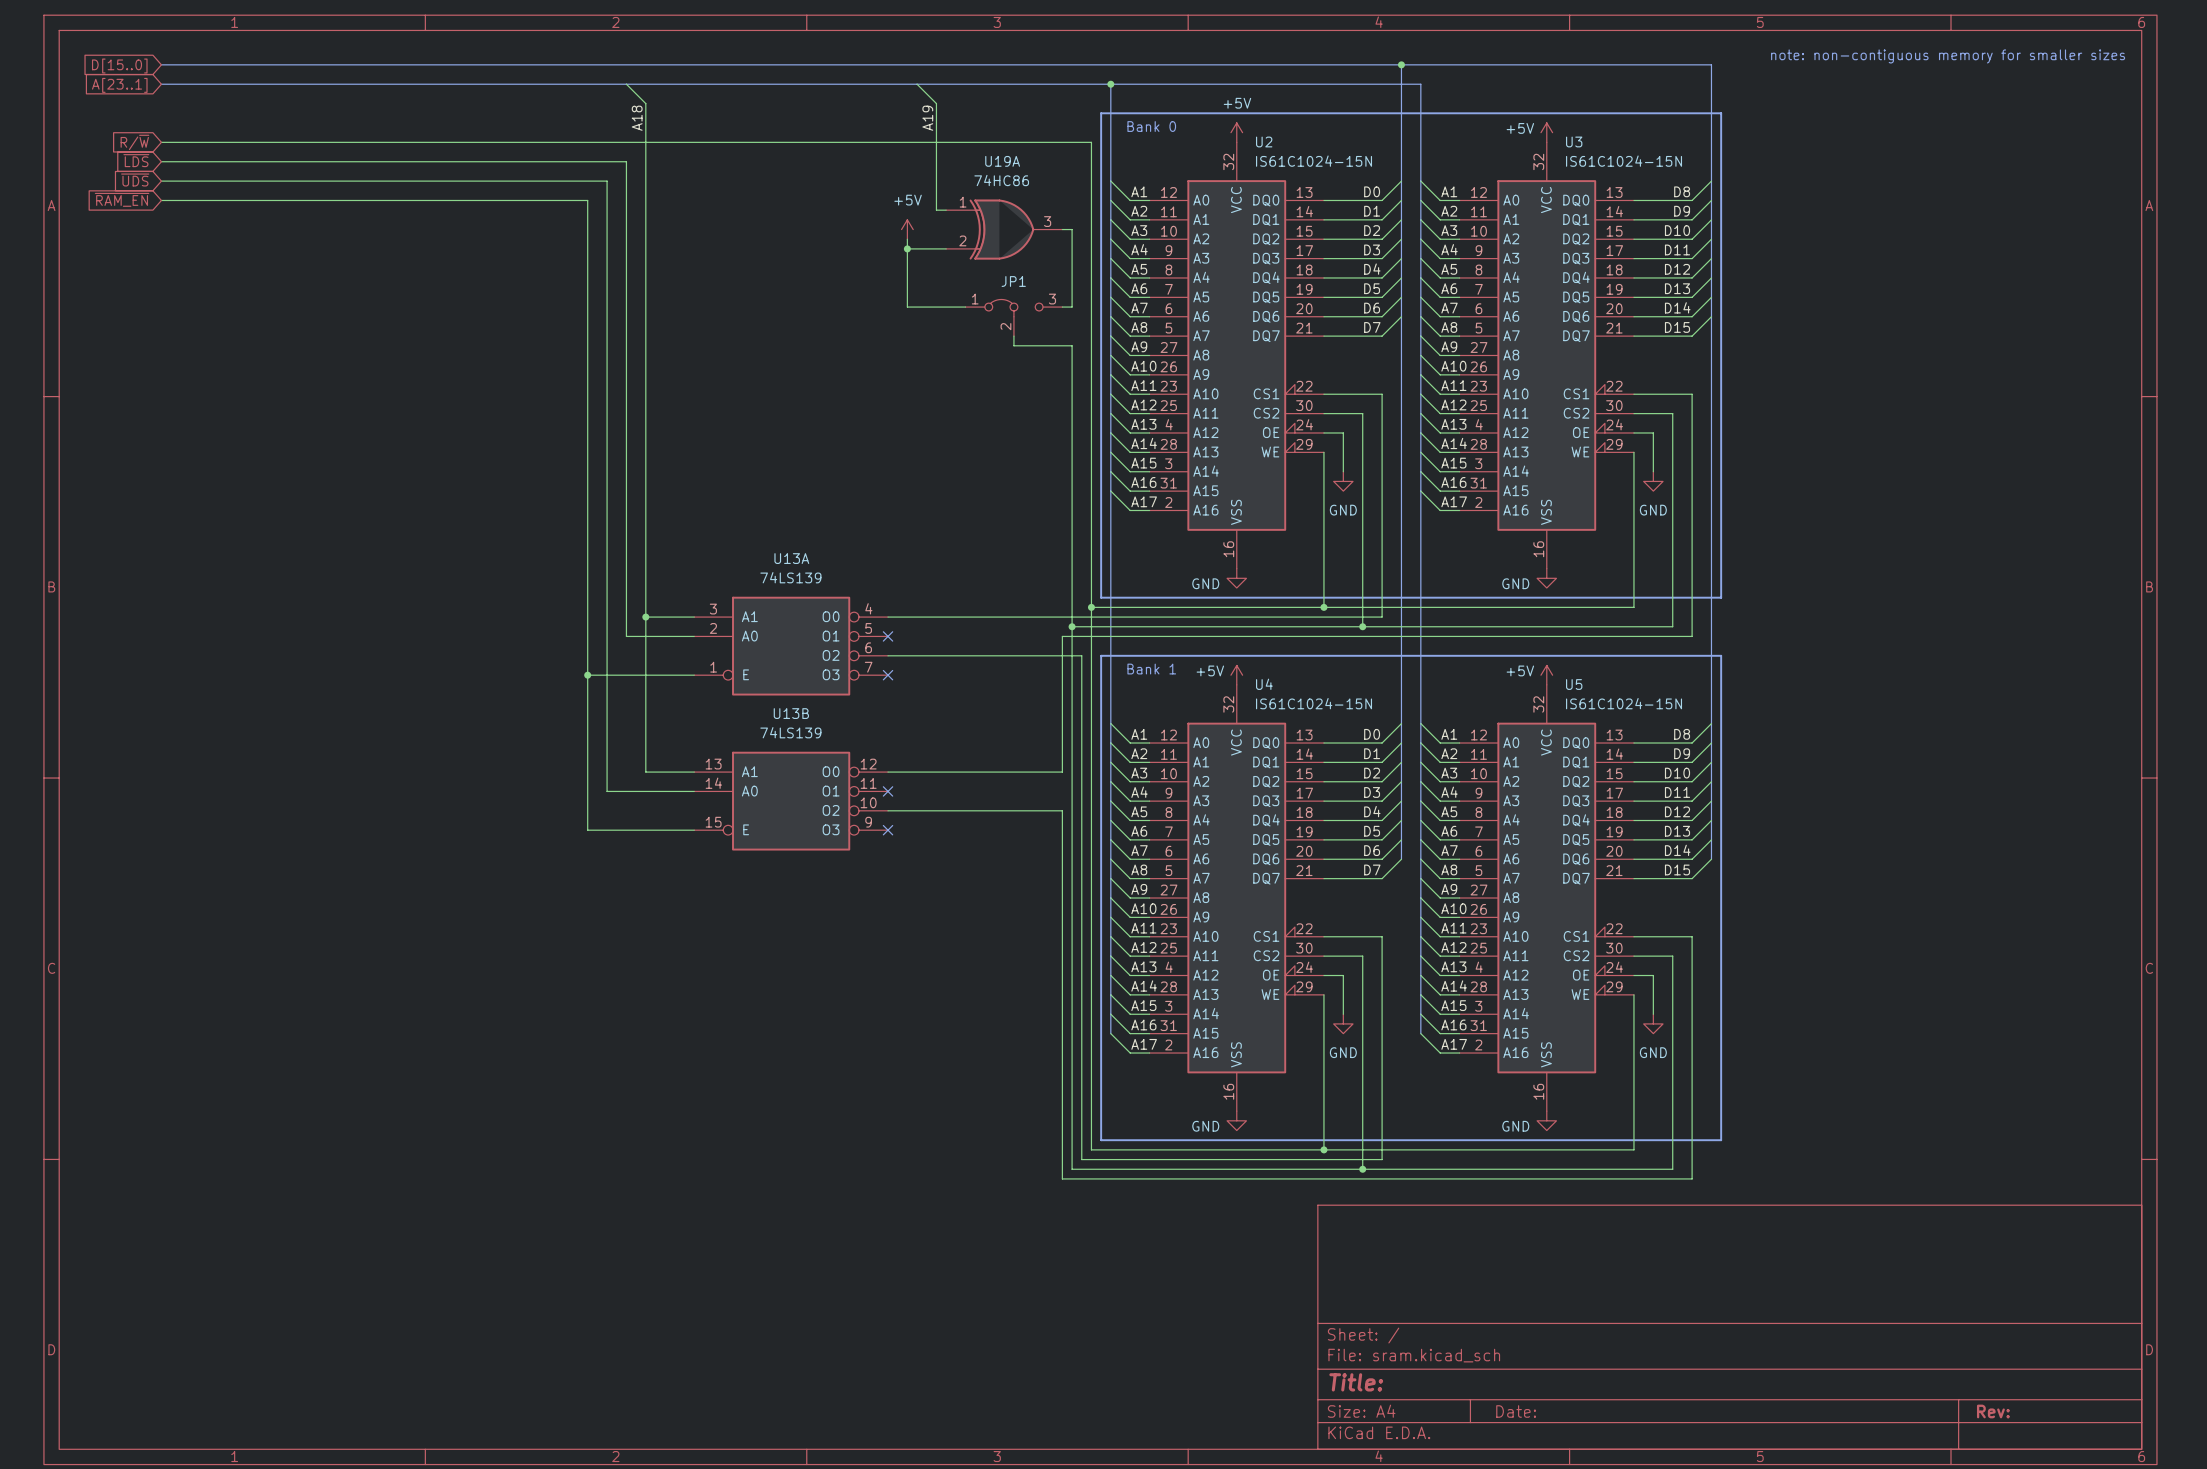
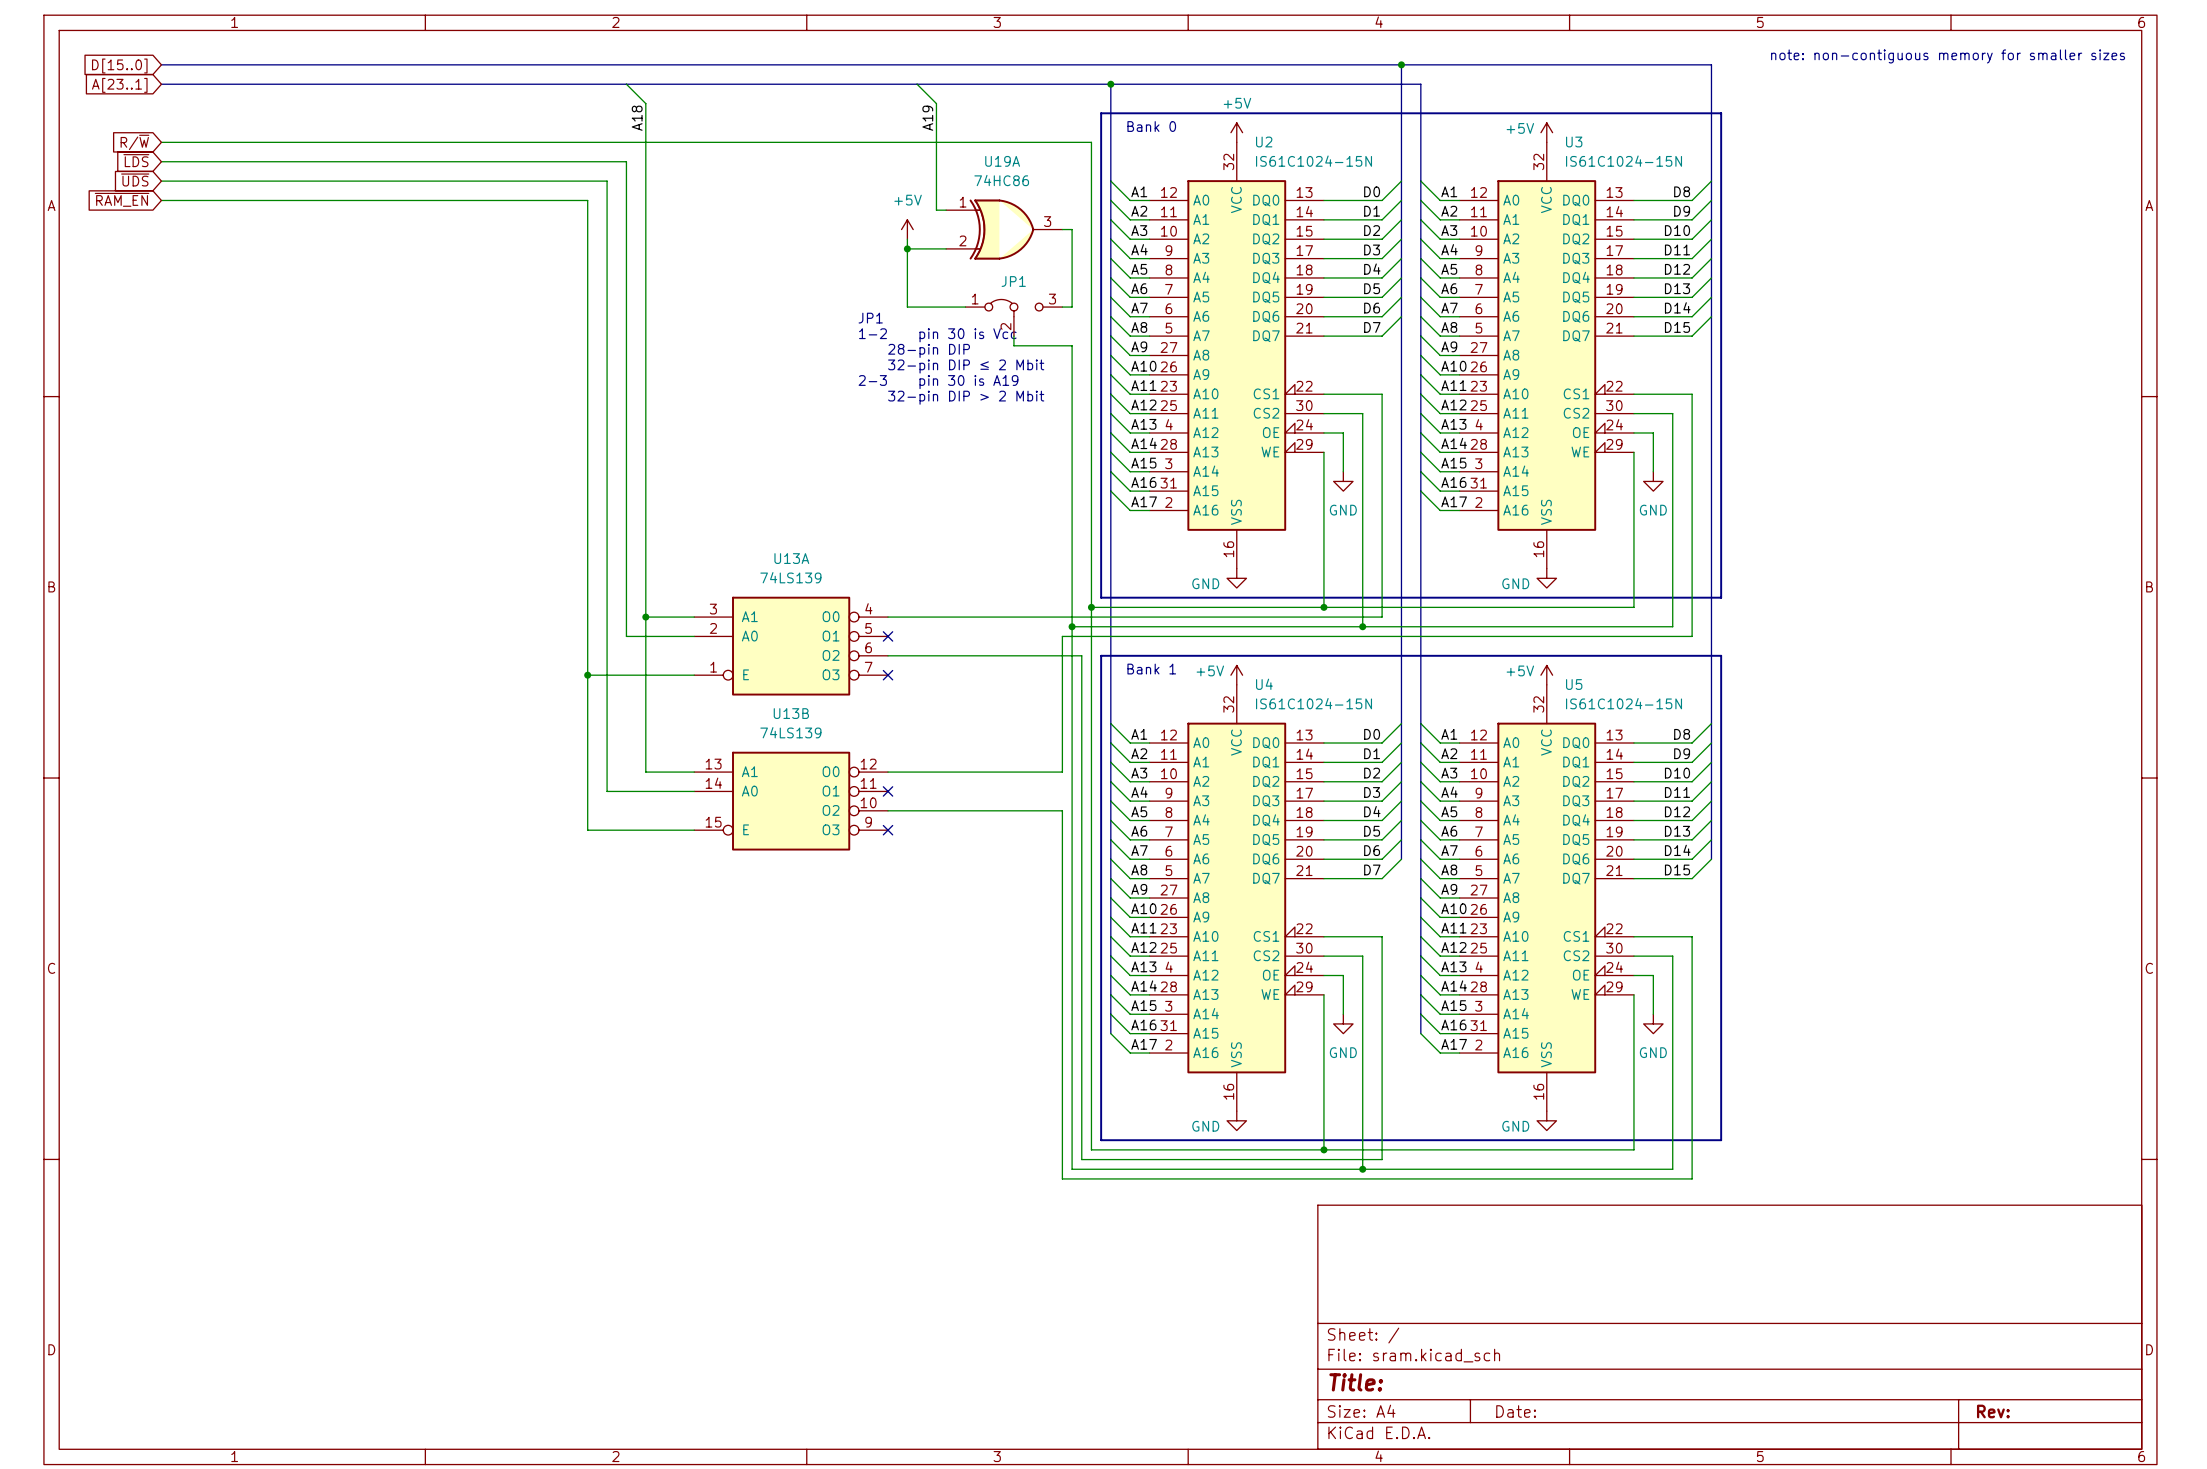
text: none -> JP1 (870, 318)
text: none -> 1-2 pin 30 is Vcc (937, 335)
text: none -> 28-pin DIP (929, 350)
text: none -> 32-pin DIP ≤ 2 Mbit (966, 366)
text: none -> 2-3 pin 30 is A19 (938, 382)
text: none -> 32-pin DIP > 2 Mbit (966, 397)

